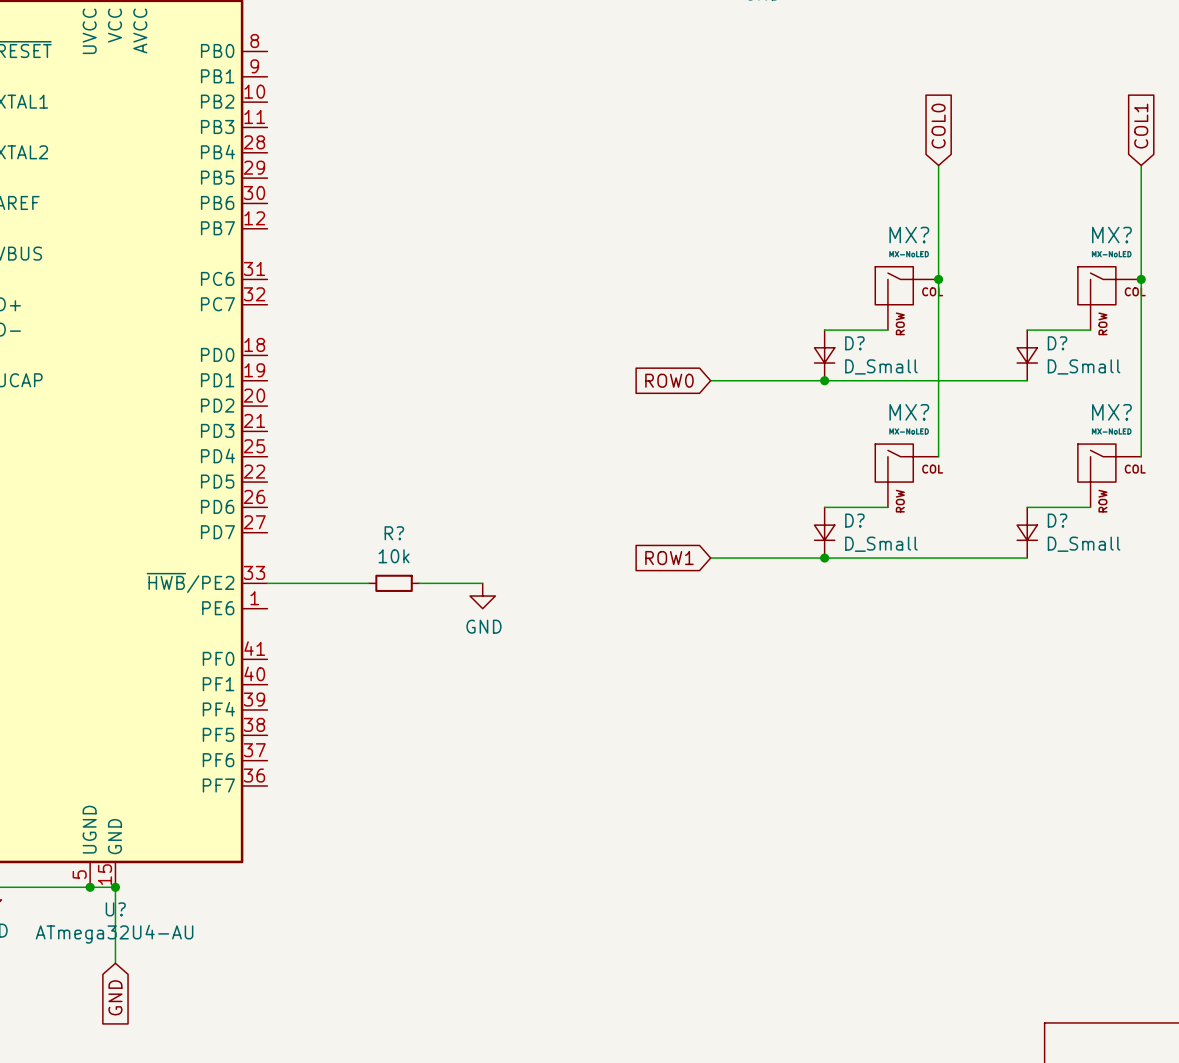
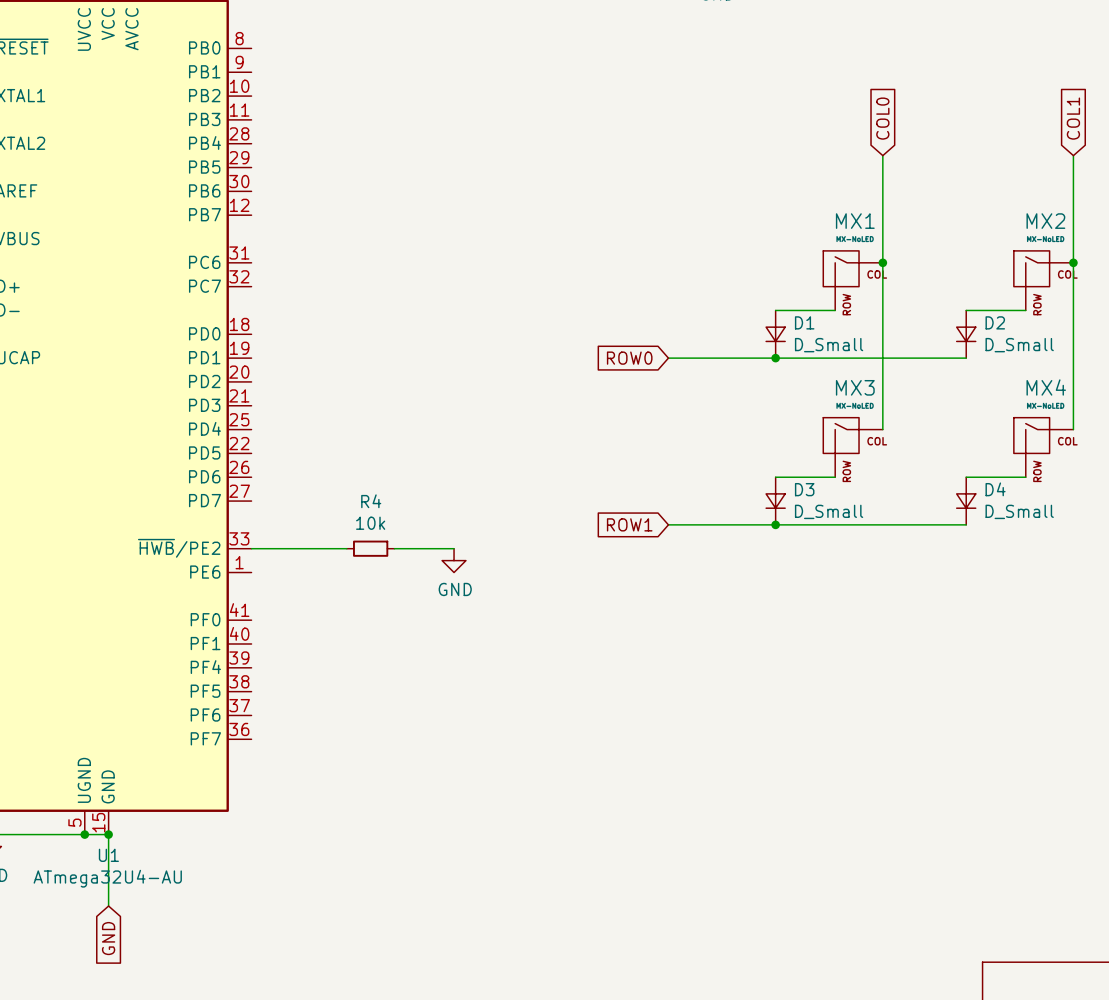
MX? name: MX? (909, 235) -> MX1 (855, 221)
MX? name: MX? (1111, 235) -> MX2 (1045, 221)
D? name: D? (854, 343) -> D1 (804, 322)
D? name: D? (1057, 343) -> D2 (995, 322)
MX? name: MX? (909, 412) -> MX3 (855, 387)
MX? name: MX? (1111, 412) -> MX4 (1046, 387)
D? name: D? (854, 520) -> D3 (804, 489)
D? name: D? (1057, 520) -> D4 (995, 489)
R? name: R? (394, 533) -> R4 (371, 501)
U? name: U? (115, 909) -> U1 (108, 855)

